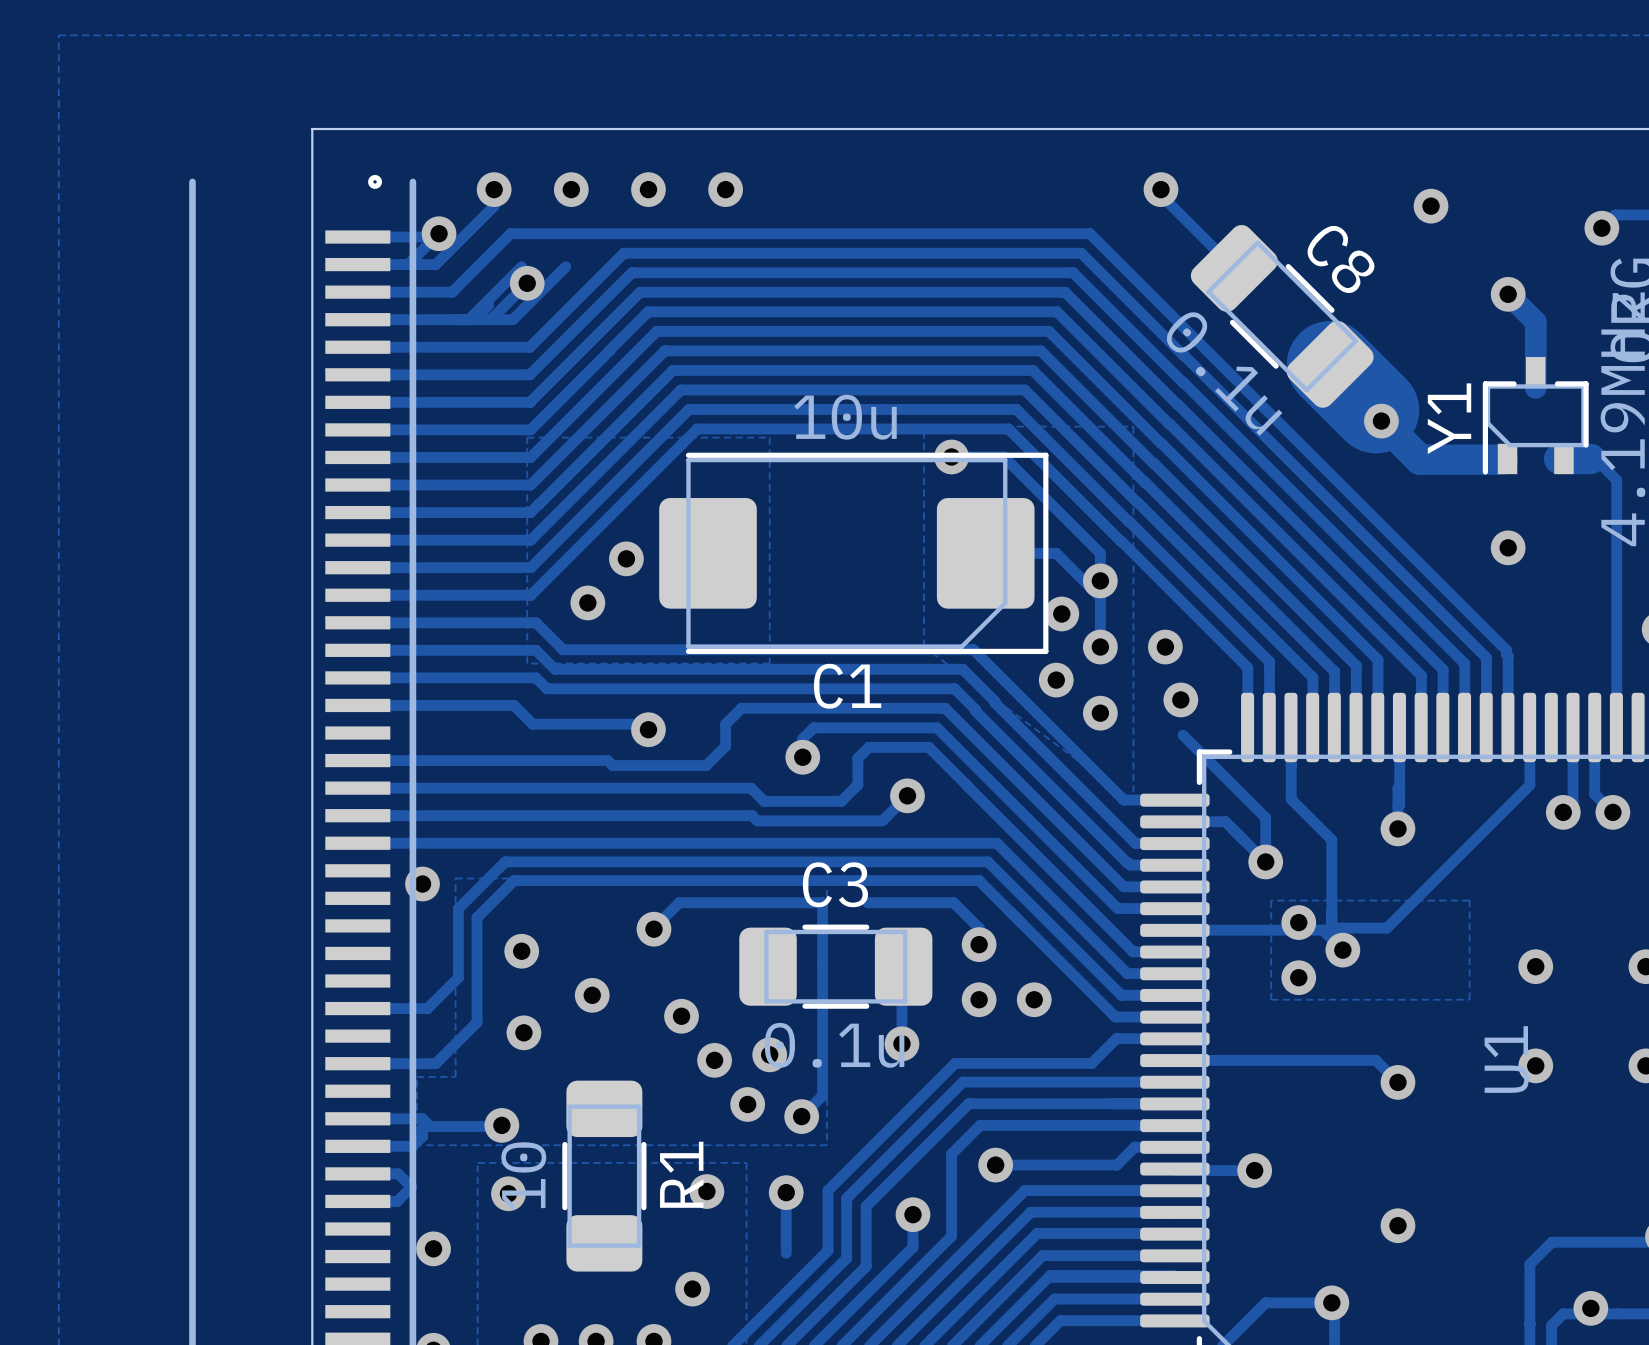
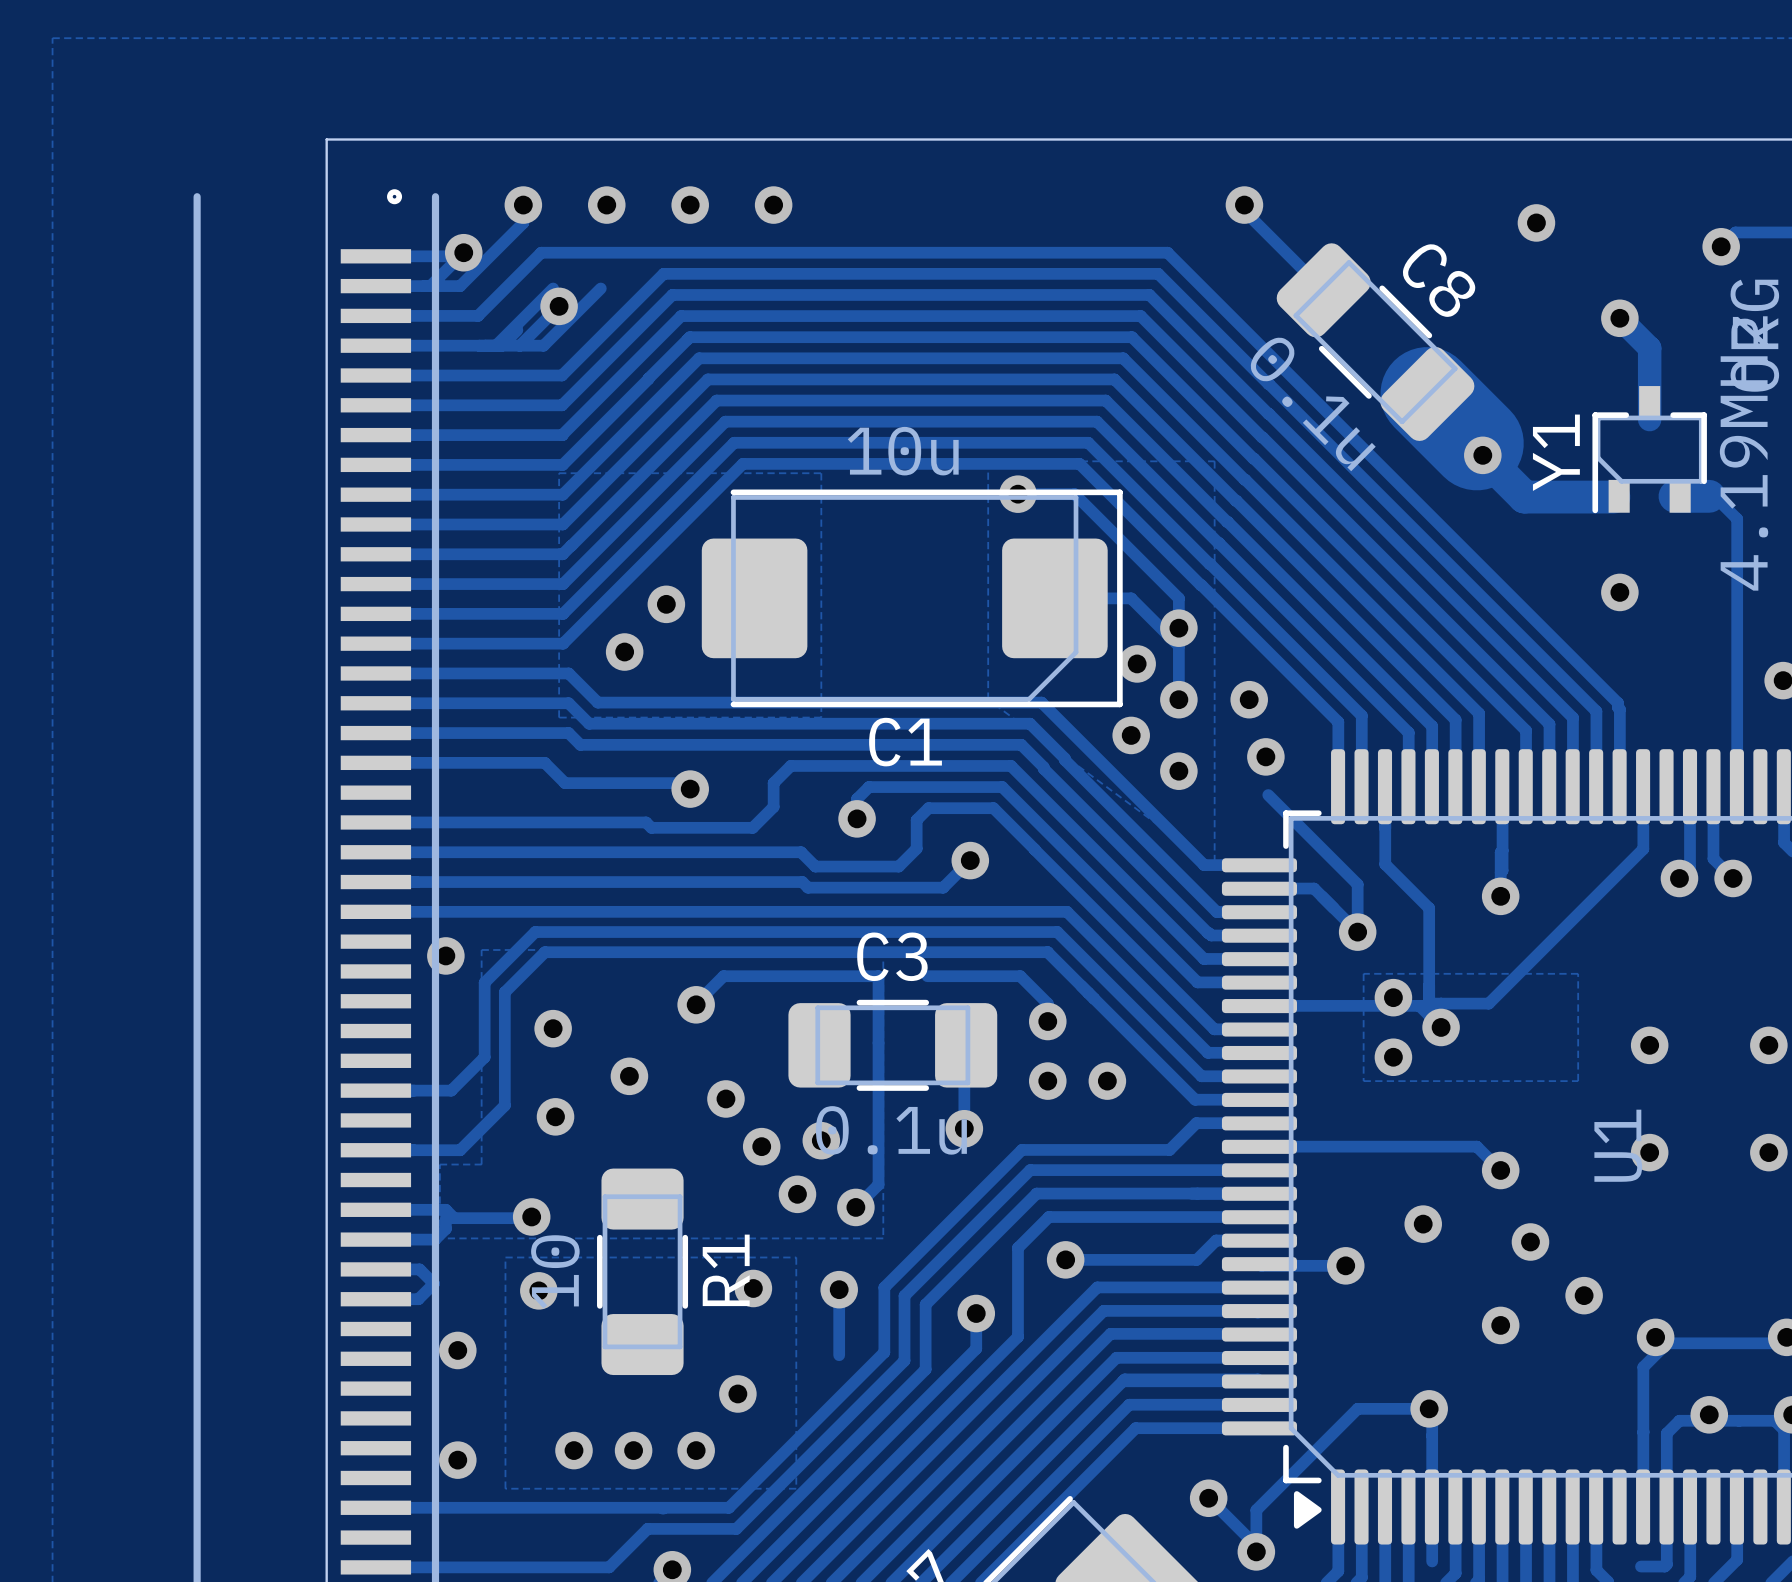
via: none -> (1423, 1224)
via: none -> (1530, 1242)
via: none -> (1584, 1295)
via: none -> (1655, 1337)

